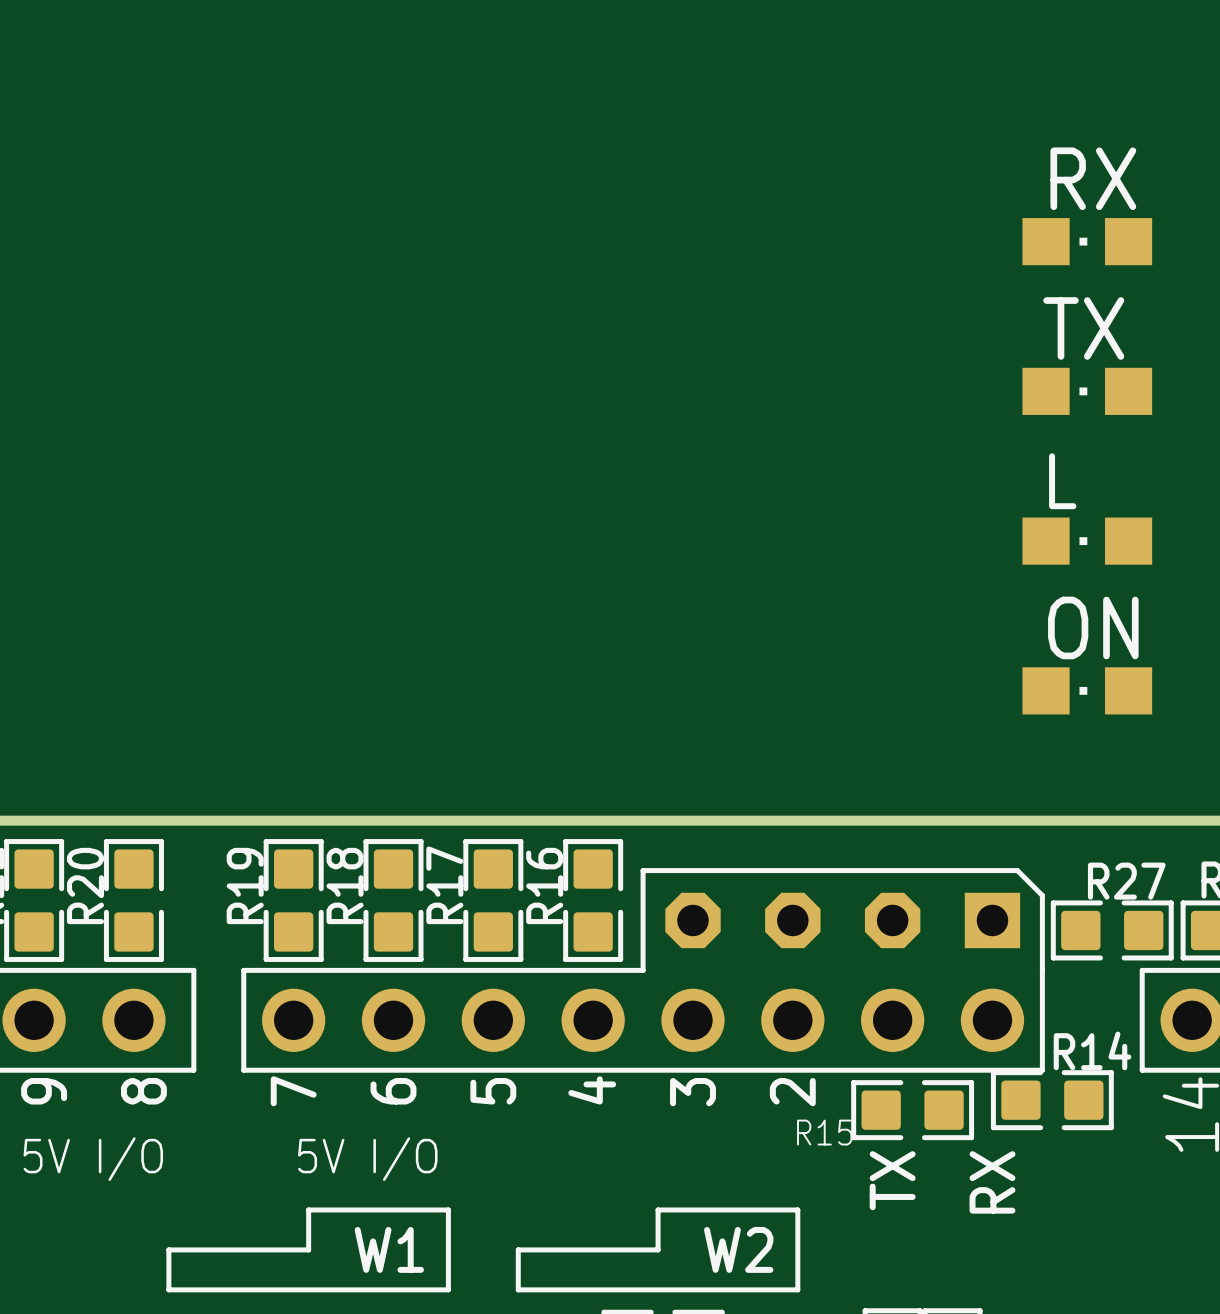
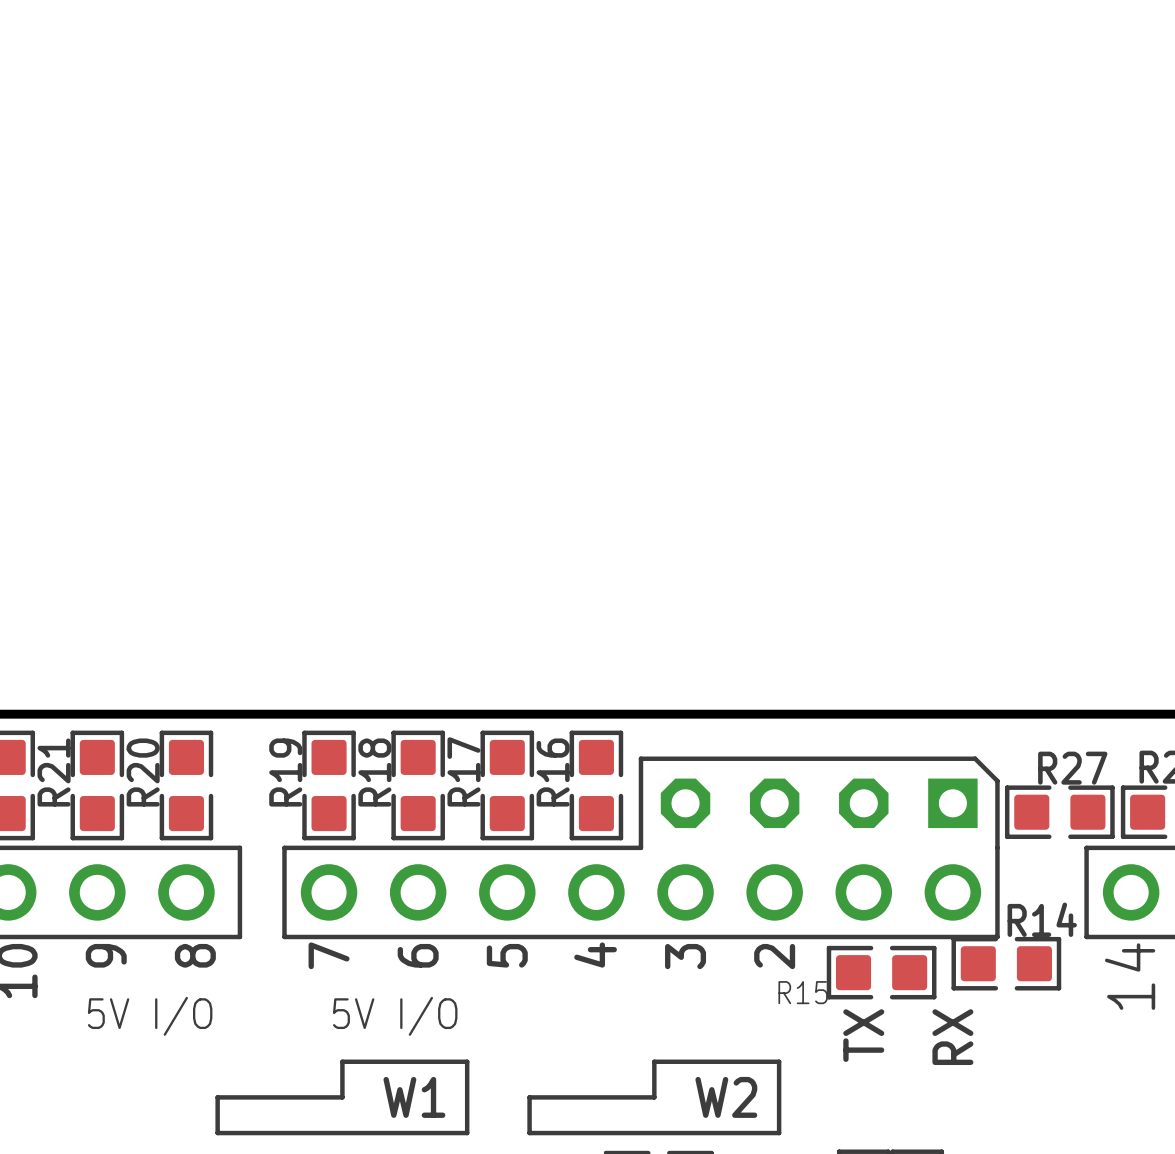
RX: (1087, 241) -> none
TX: (1087, 391) -> none
L: (1087, 541) -> none
ON: (1087, 690) -> none

